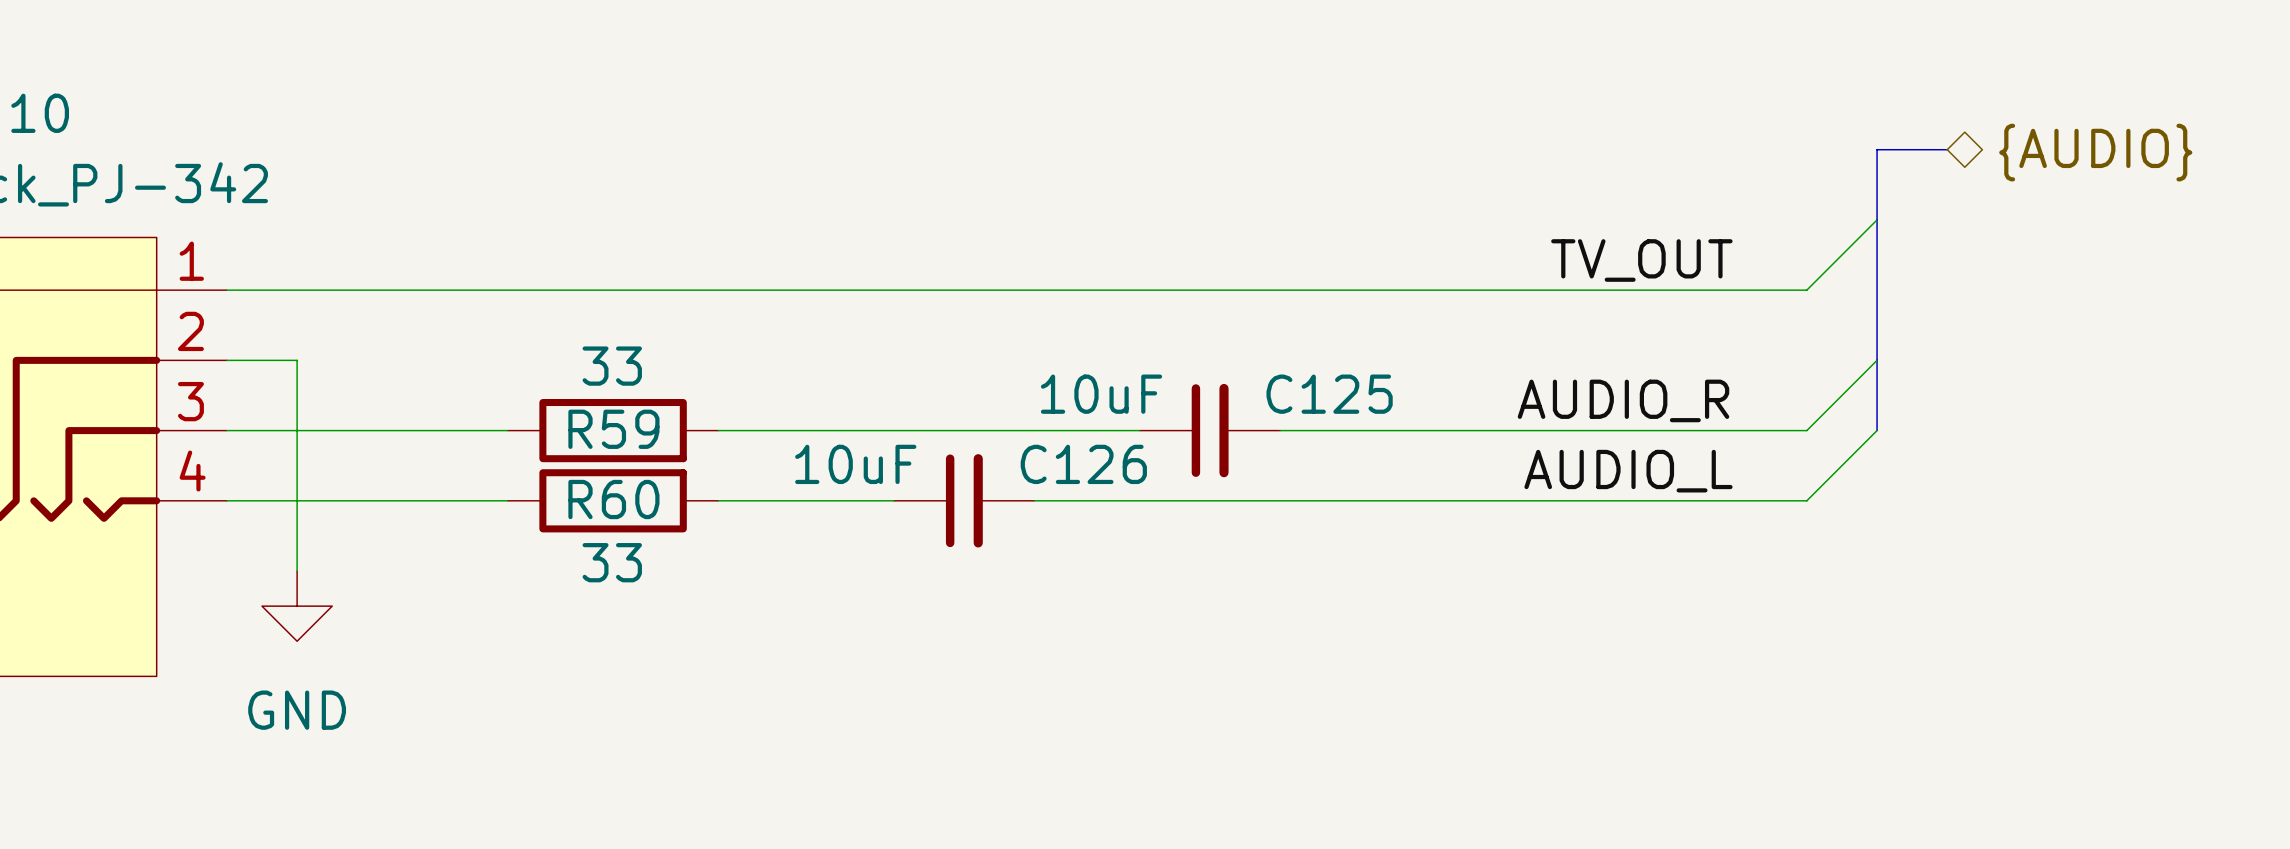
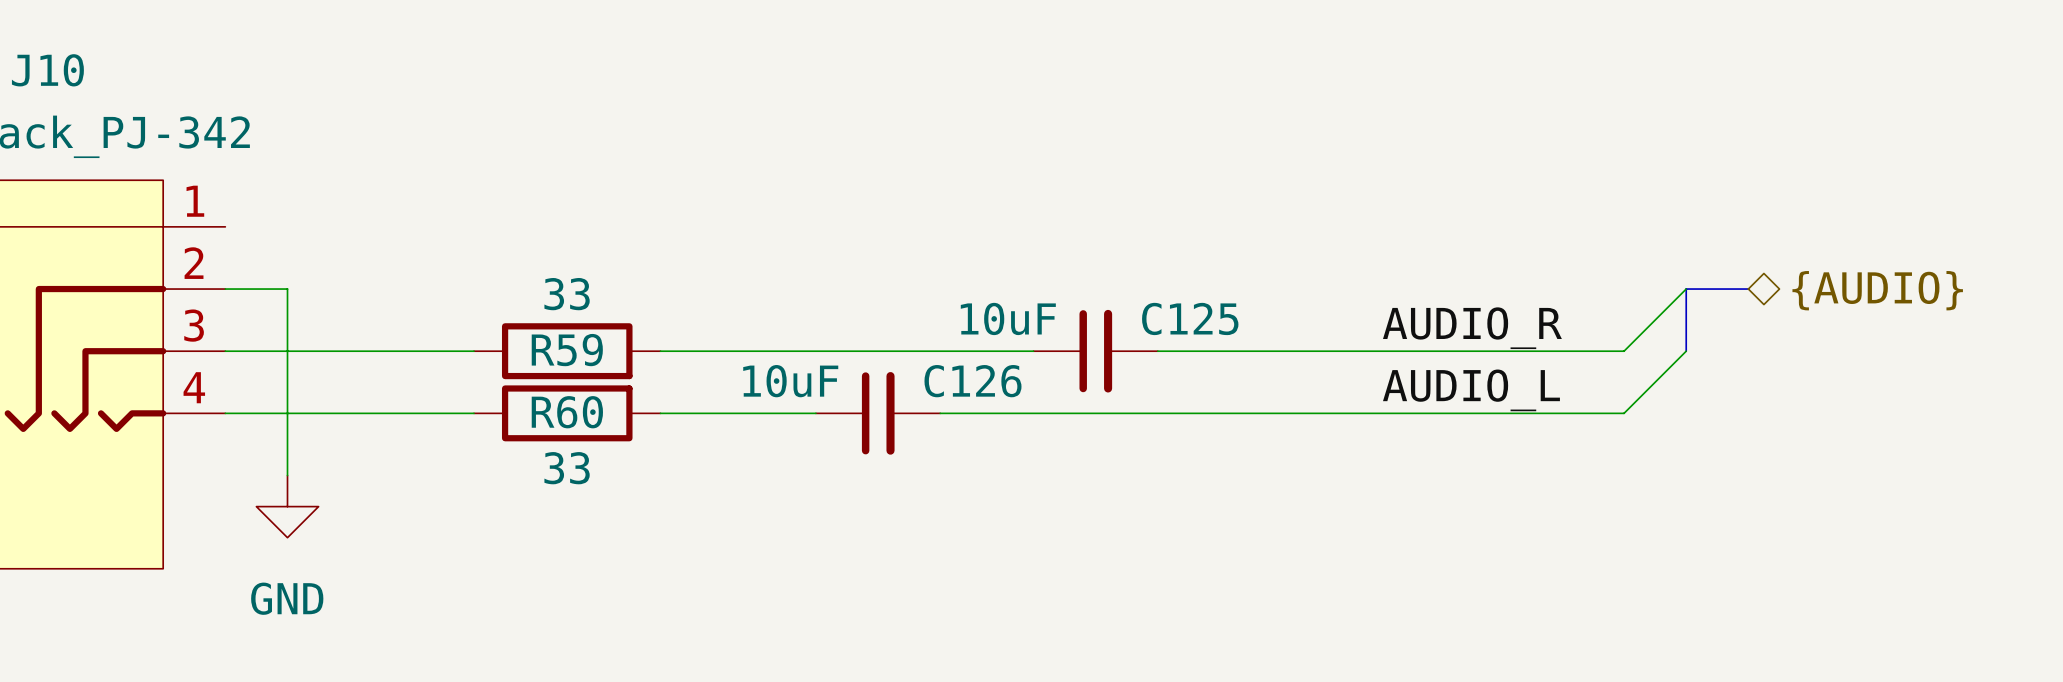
bus: (1947, 149) (1877, 149) (1877, 360) -> (1748, 289) (1686, 289)
hierarchical label position: {AUDIO} (2095, 152) -> {AUDIO} (1877, 290)
wire: (1877, 219) (1806, 290) (226, 290) -> none
label: TV_OUT (1641, 260) -> none

